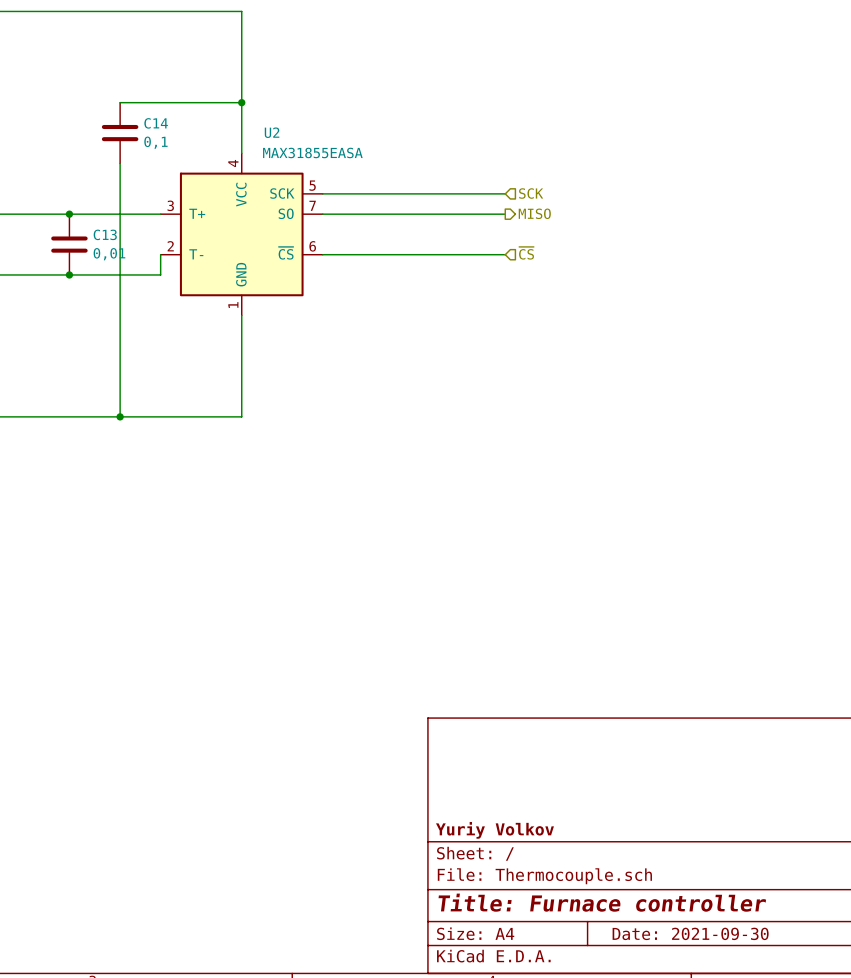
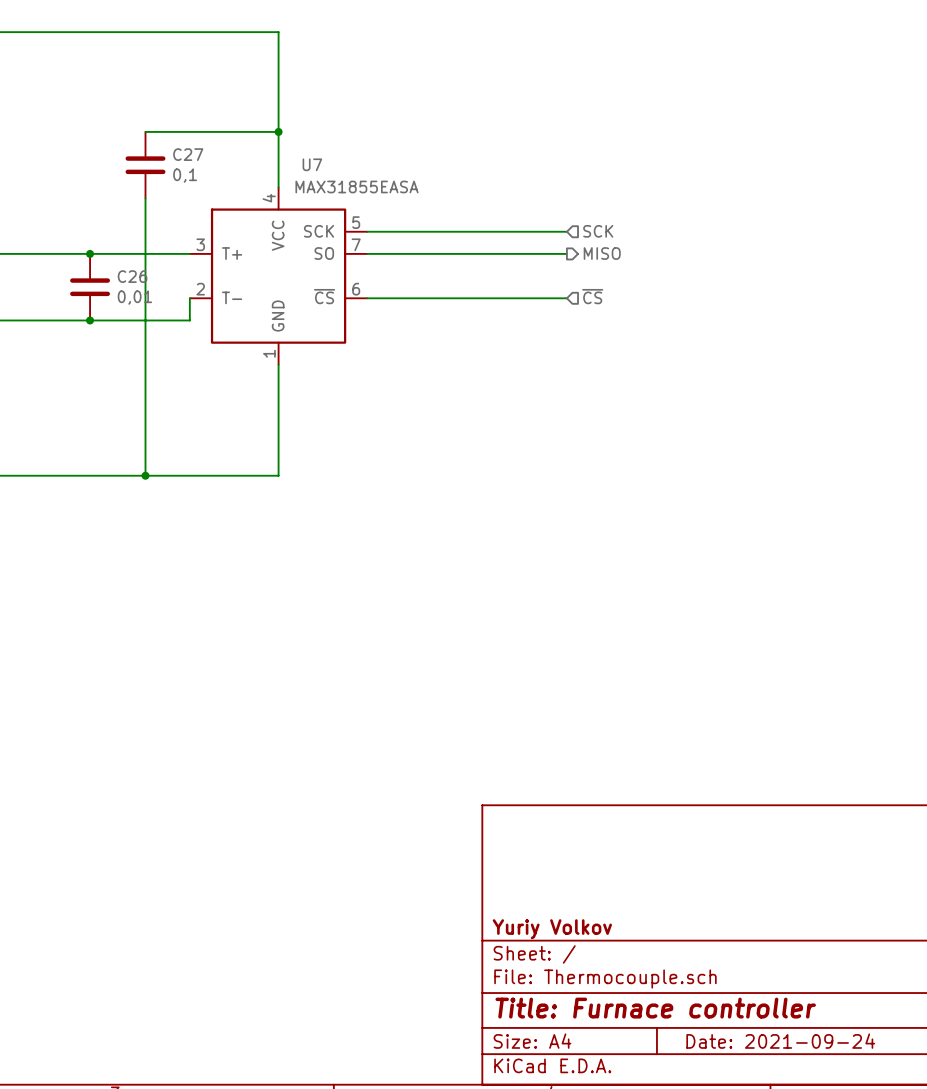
C14 name: C14 (156, 123) -> C27 (188, 154)
U2 name: U2 (272, 132) -> U7 (312, 164)
C13 name: C13 (105, 234) -> C26 (132, 276)
title block: Date: 2021-09-30 (690, 933) -> Date: 2021-09-24 (780, 1041)

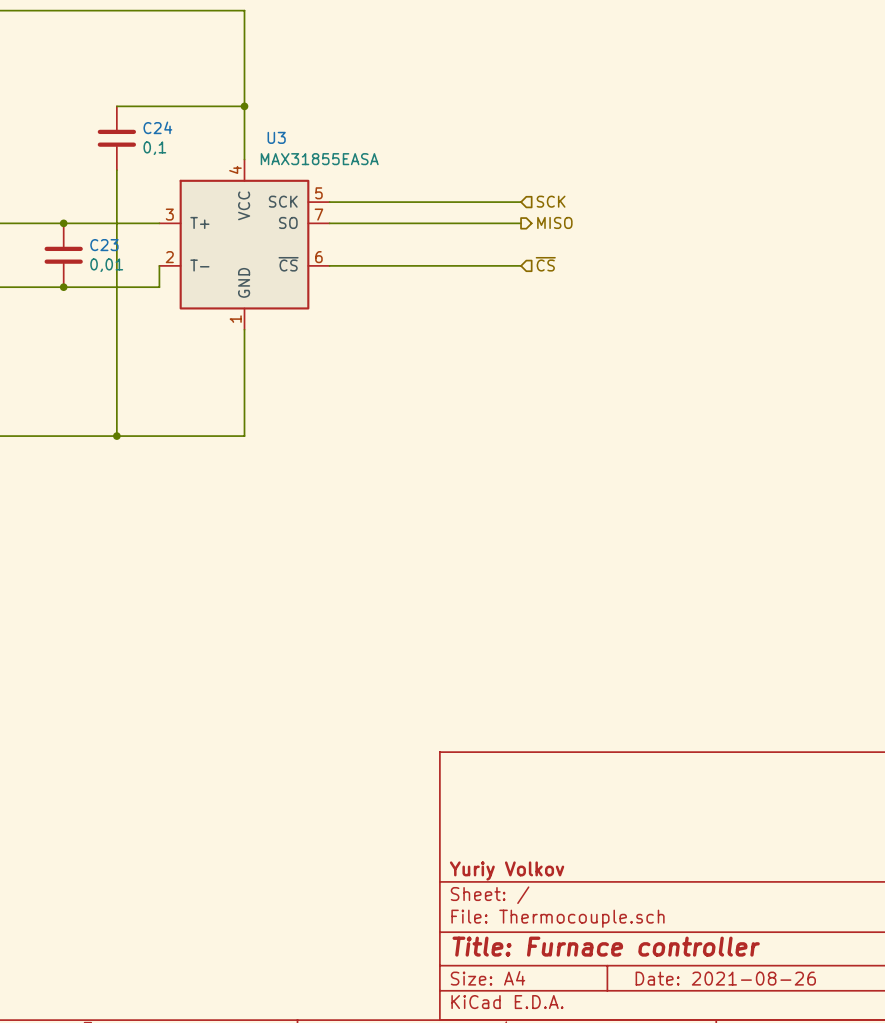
C27 name: C27 (188, 154) -> C24 (157, 127)
U7 name: U7 (312, 164) -> U3 (276, 137)
C26 name: C26 (132, 276) -> C23 (104, 245)
title block: Date: 2021-09-24 (780, 1041) -> Date: 2021-08-26 (725, 978)

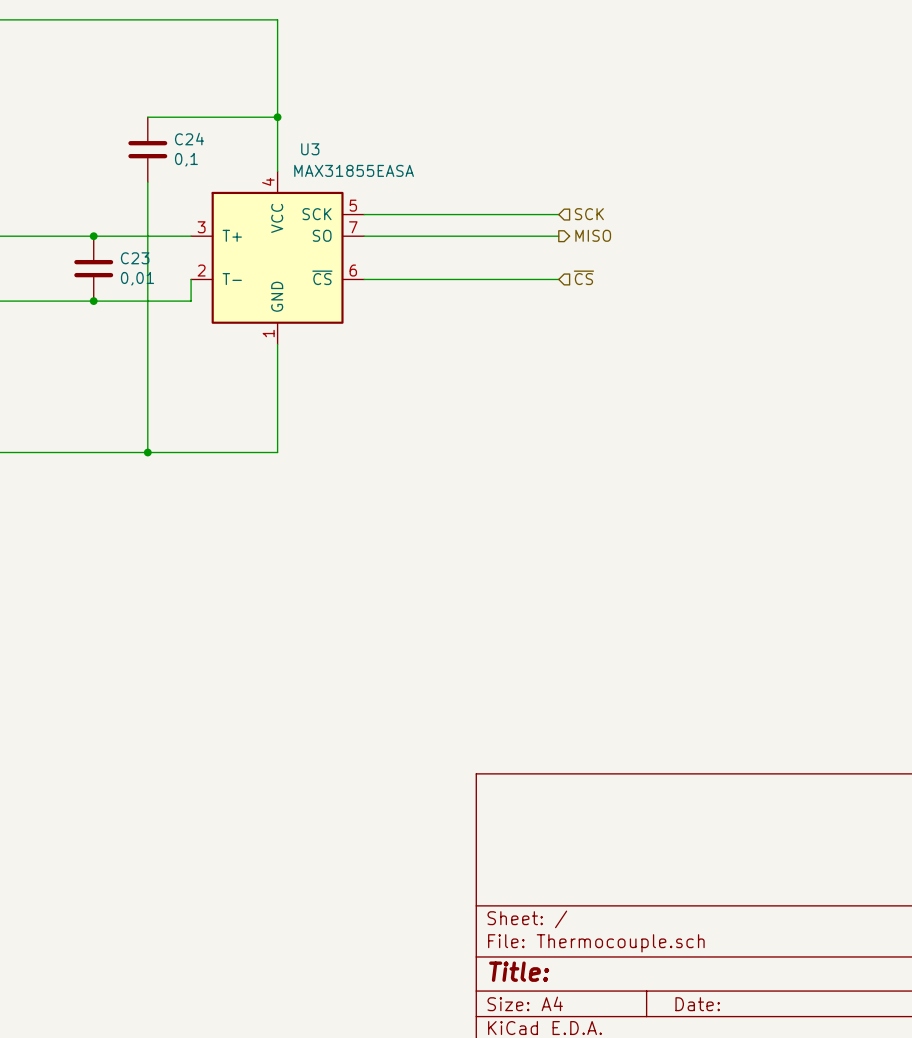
title block: Yuriy Volkov (507, 870) -> none
title block: Title: Furnace controller (606, 946) -> Title: (519, 971)
title block: Date: 2021-08-26 (725, 978) -> Date: (697, 1004)

